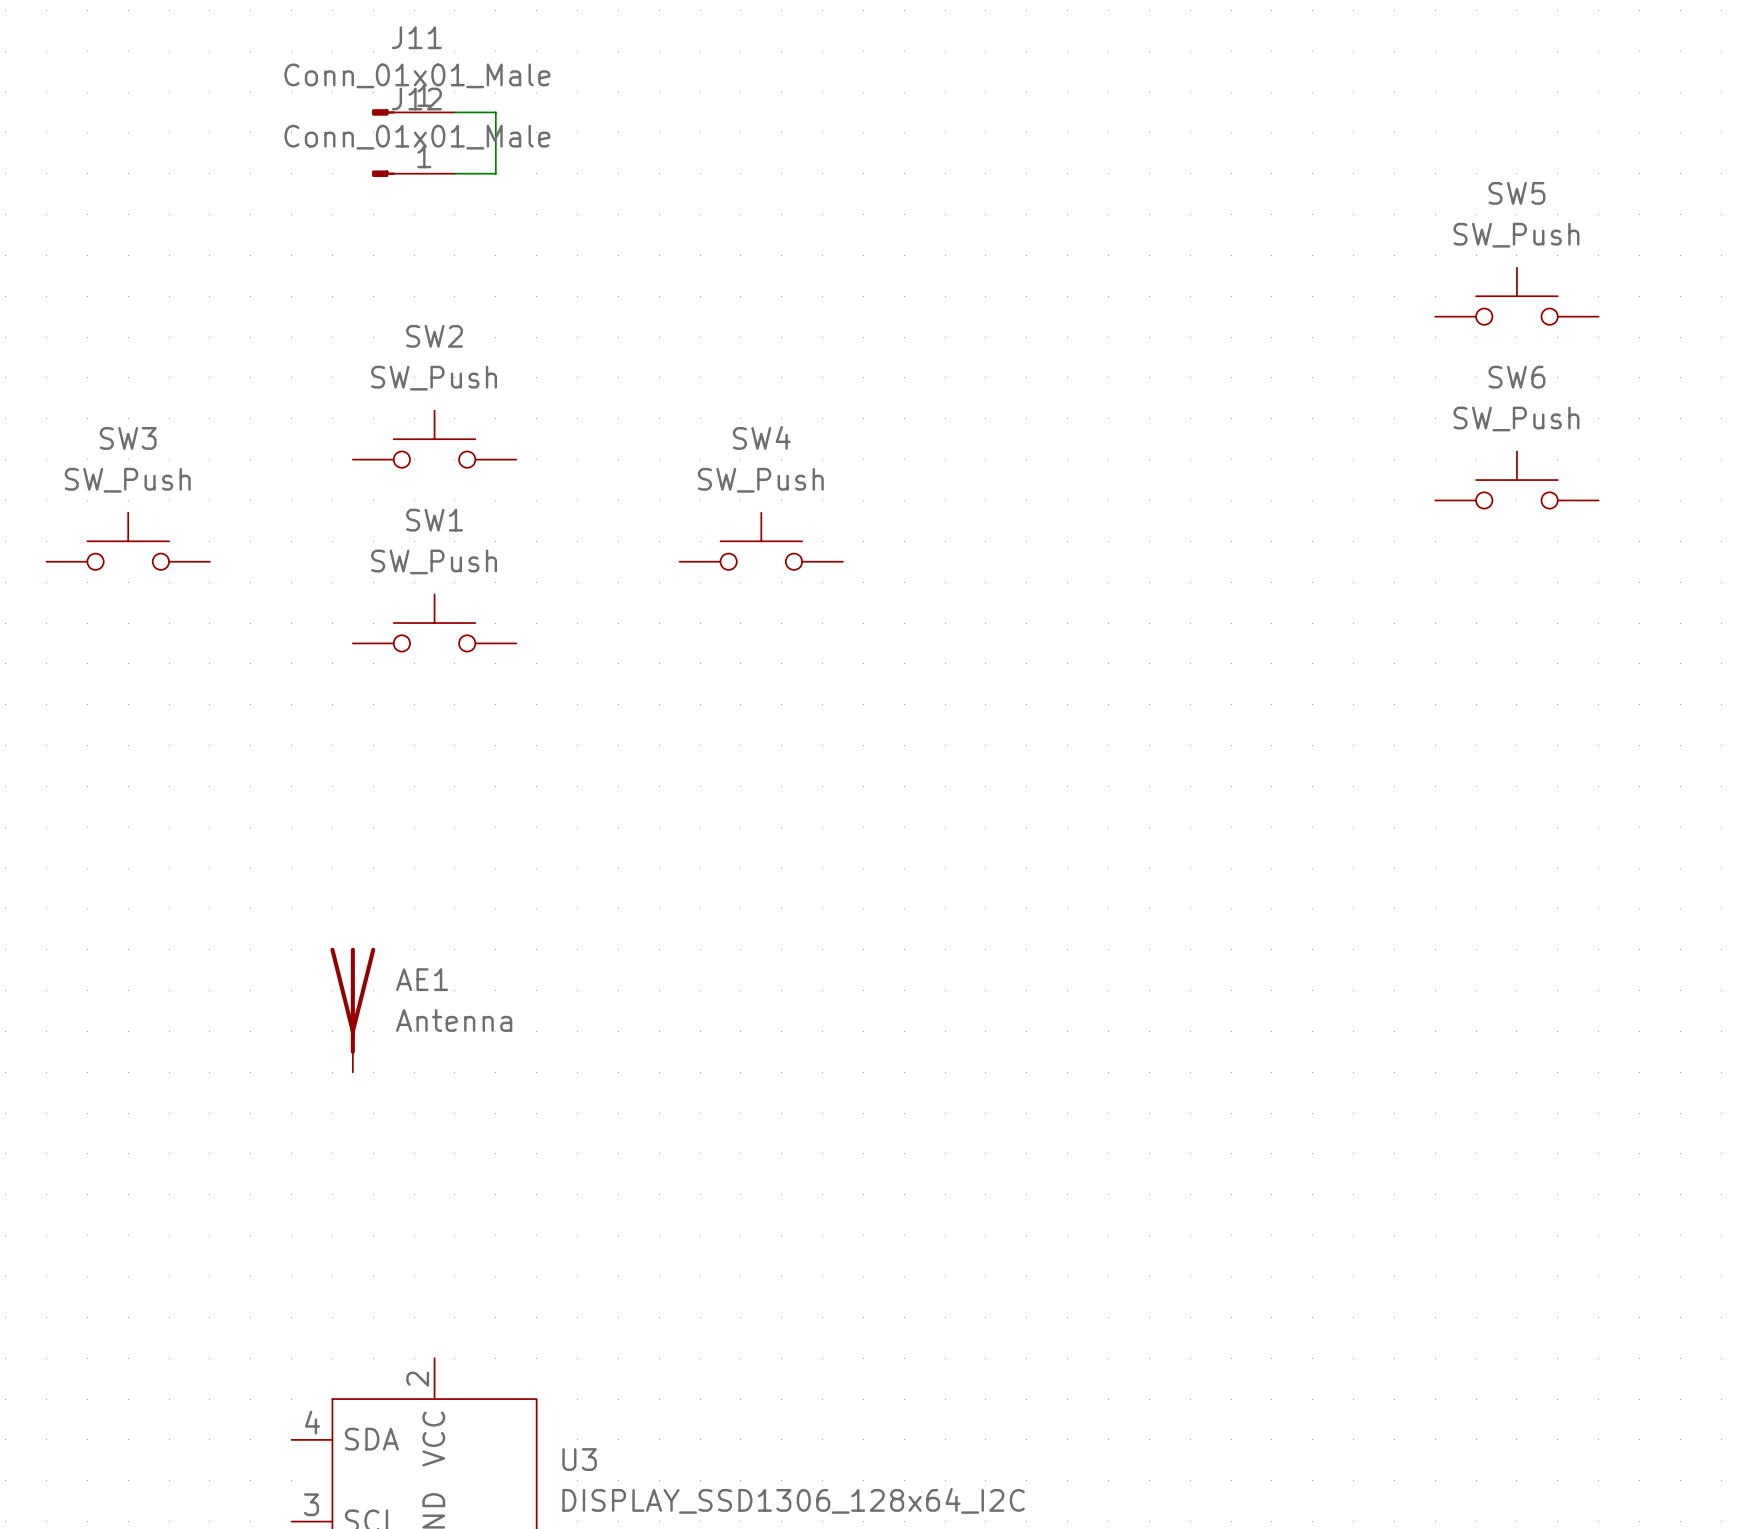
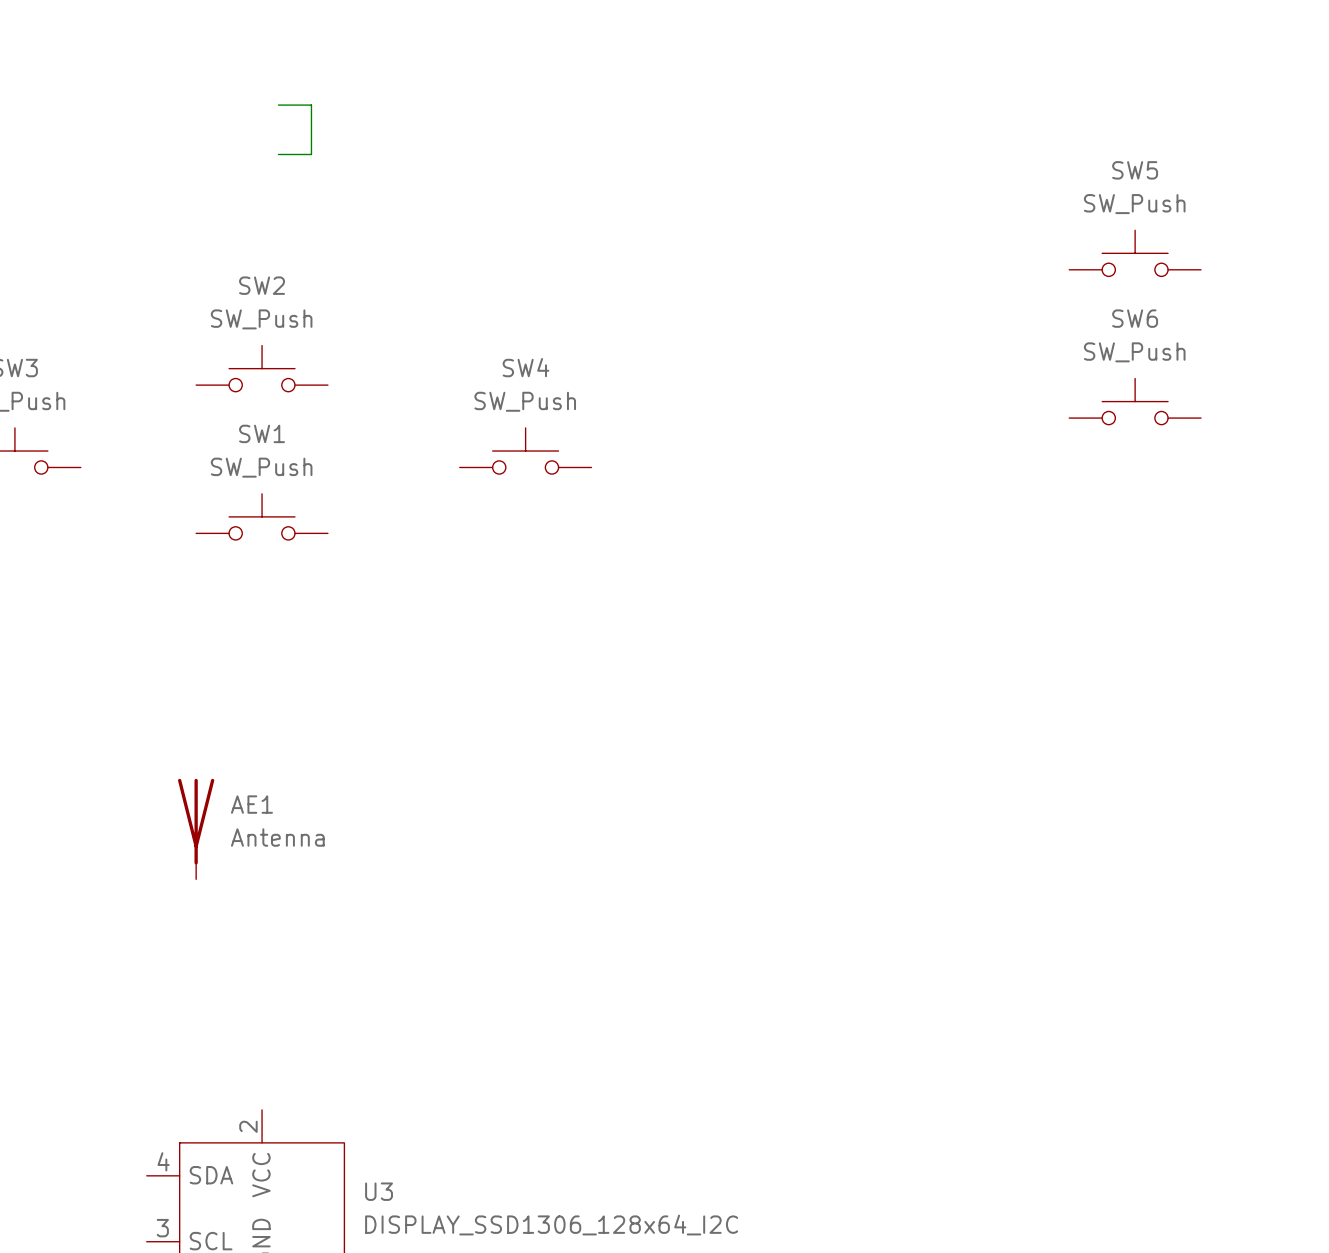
J11: Conn_01x01_Male (413, 112) -> none
J12: Conn_01x01_Male (413, 173) -> none

